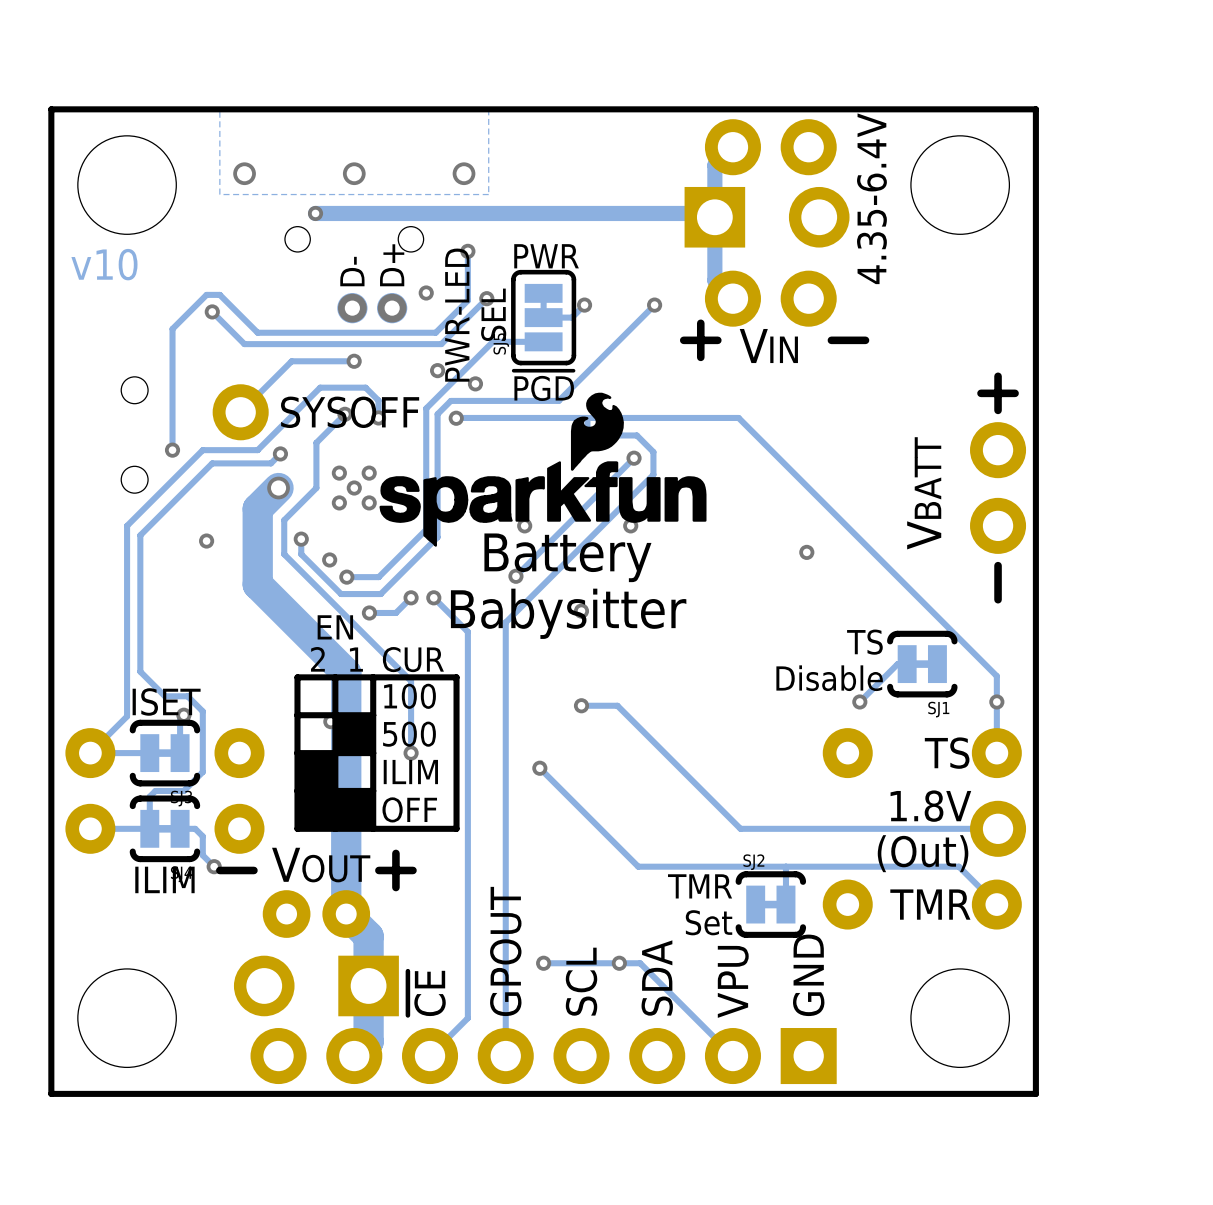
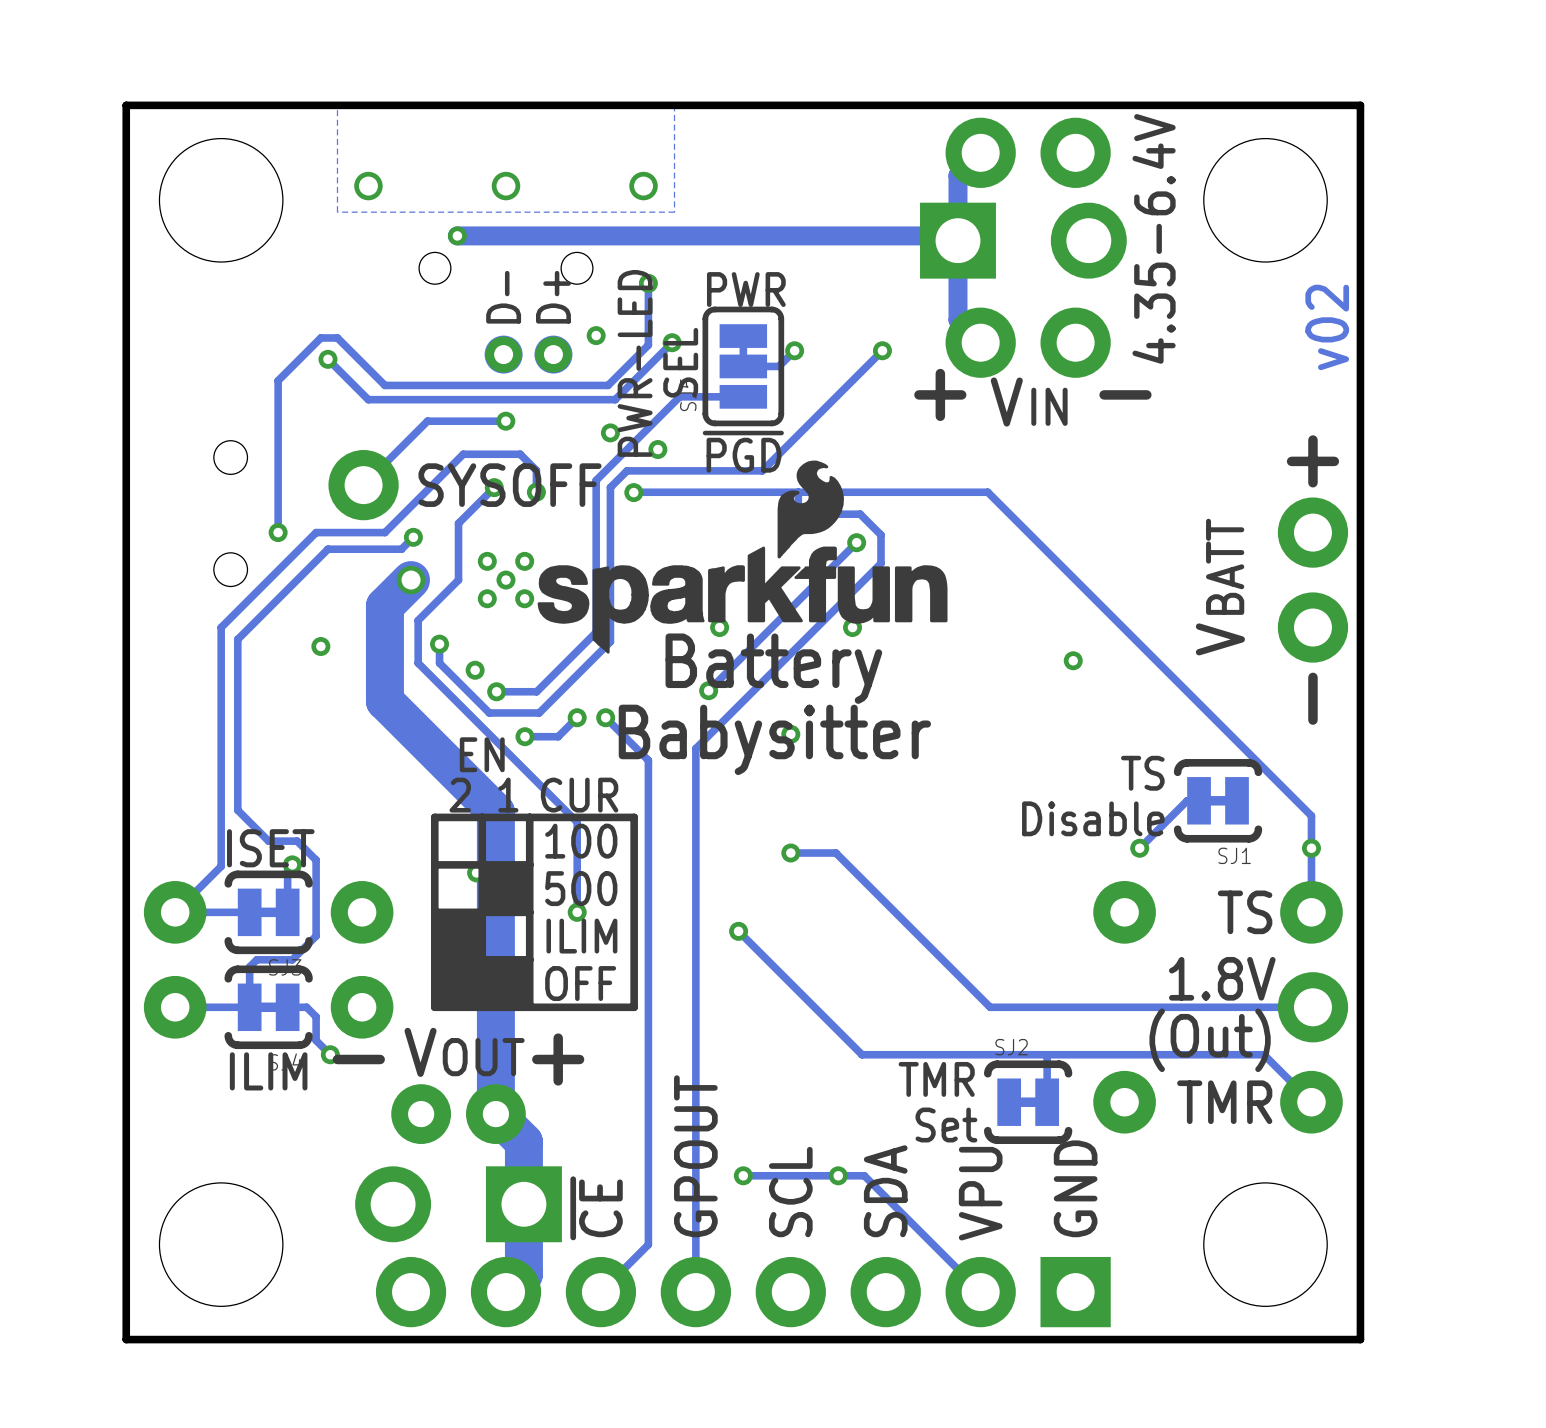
text: v10 (104, 264) -> none
text: none -> v02 (1327, 327)

